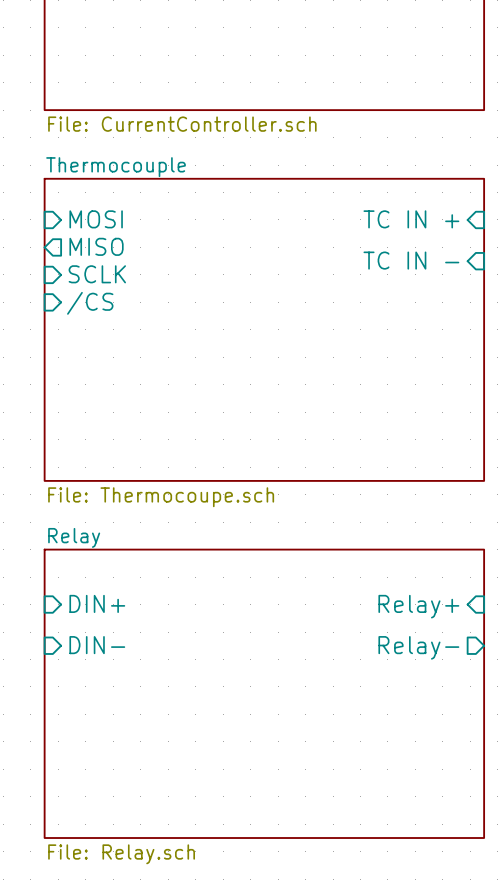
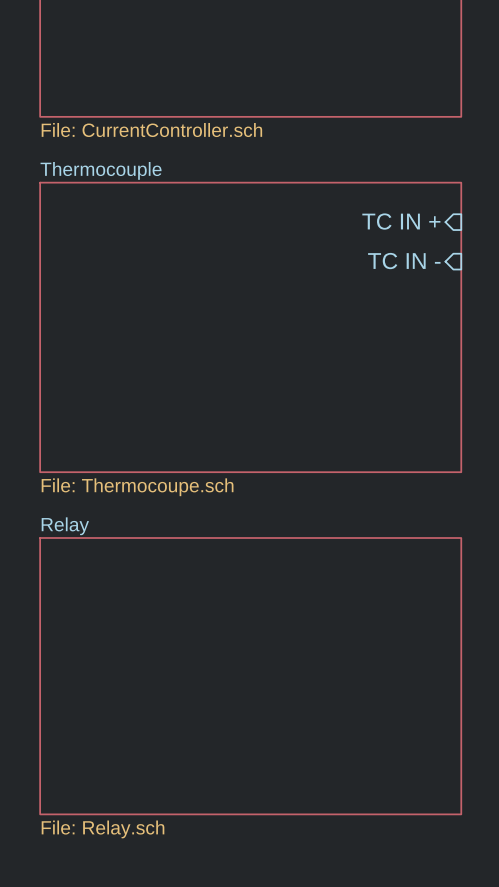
sheet pin: MOSI (96, 219) -> none
sheet pin: MISO (96, 246) -> none
sheet pin: SCLK (97, 274) -> none
sheet pin: /CS (90, 303) -> none
sheet pin: DIN+ (97, 603) -> none
sheet pin: Relay+ (418, 606) -> none
sheet pin: DIN- (97, 645) -> none
sheet pin: Relay- (418, 647) -> none

